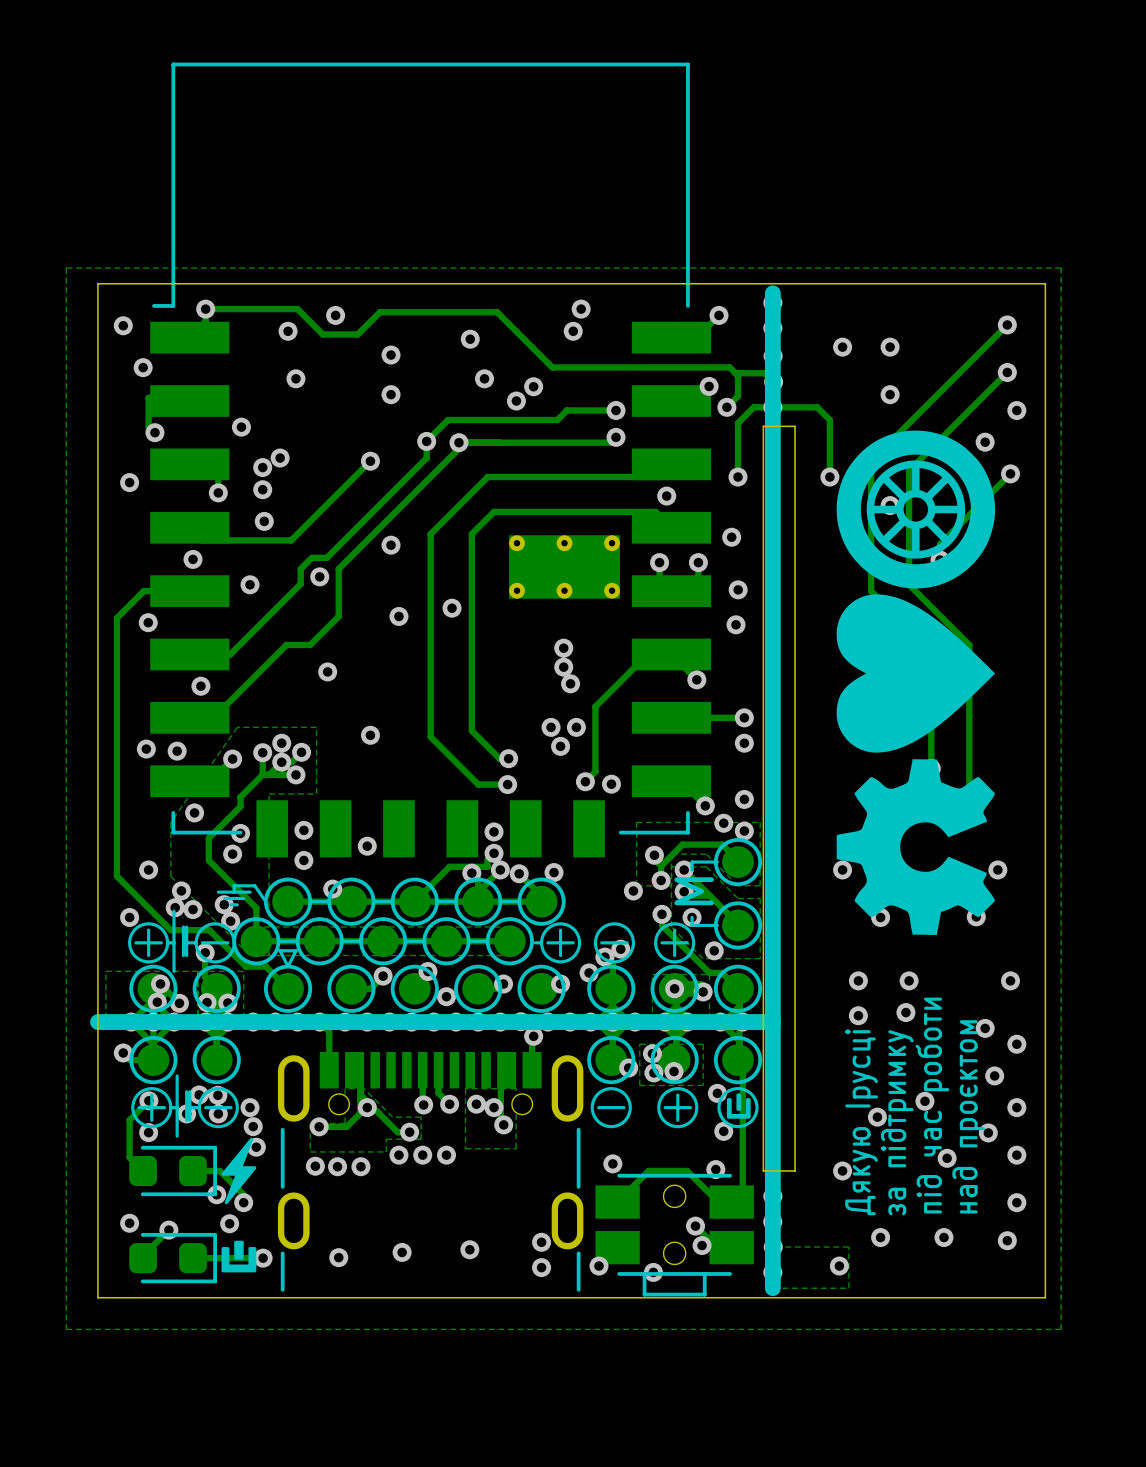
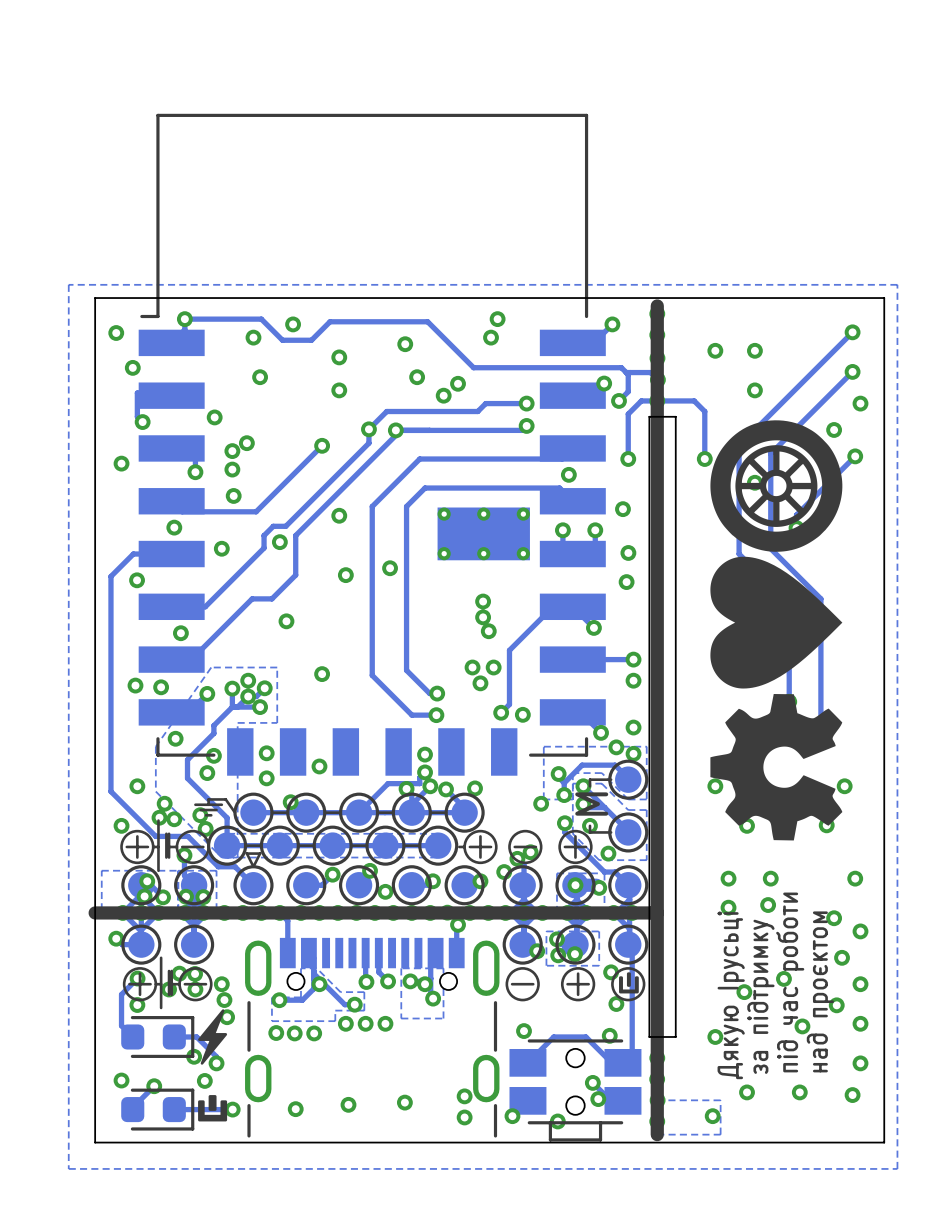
text: Дякую Ірусці (861, 1122) -> Дякую Ірусьці (731, 995)

